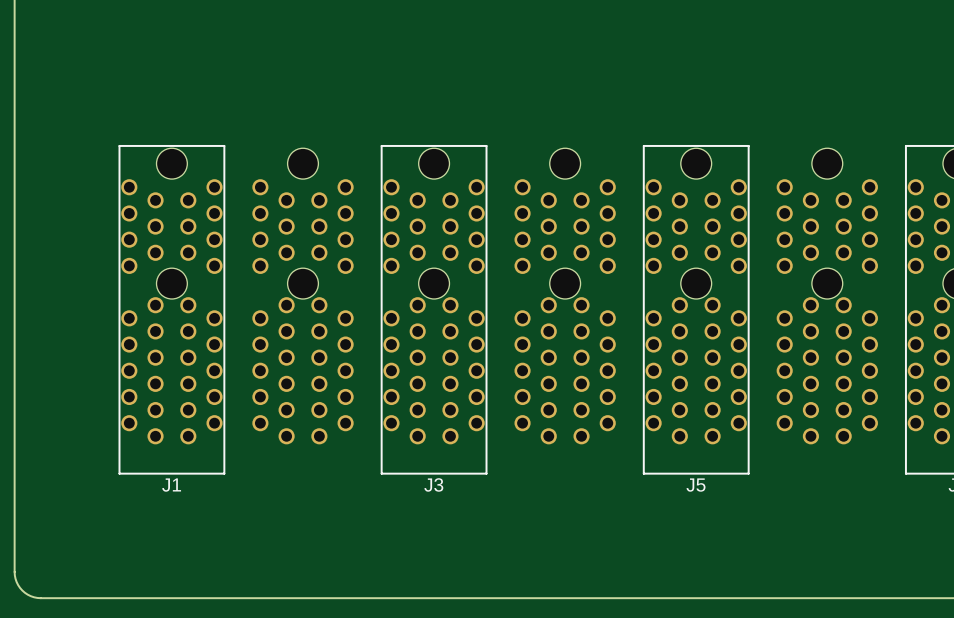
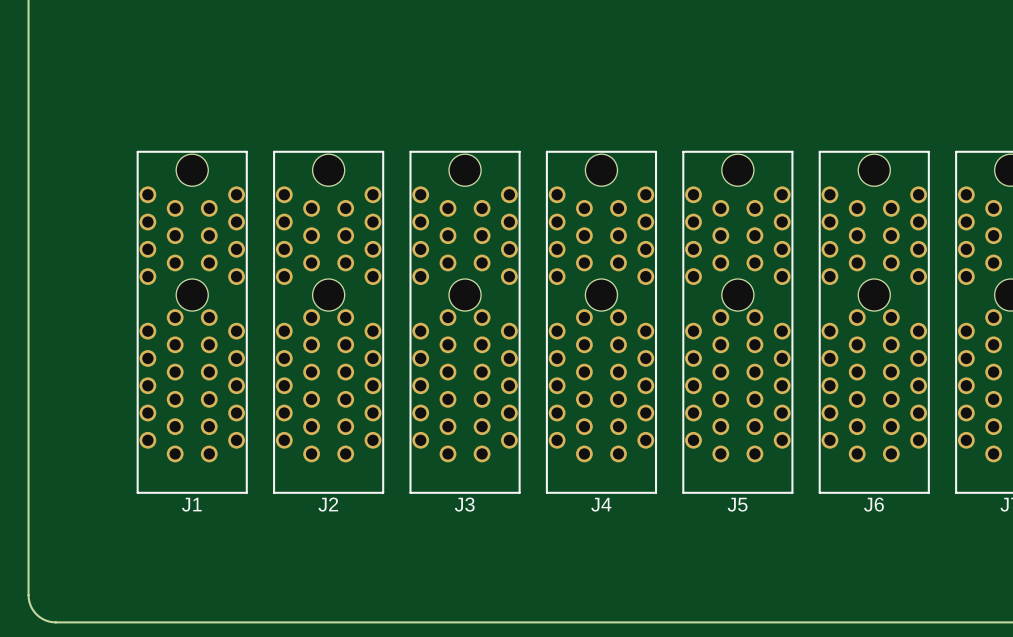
J2 side: bottom (303, 296) -> top (328, 322)
J4 side: bottom (565, 296) -> top (601, 322)
J6 side: bottom (827, 296) -> top (874, 322)

